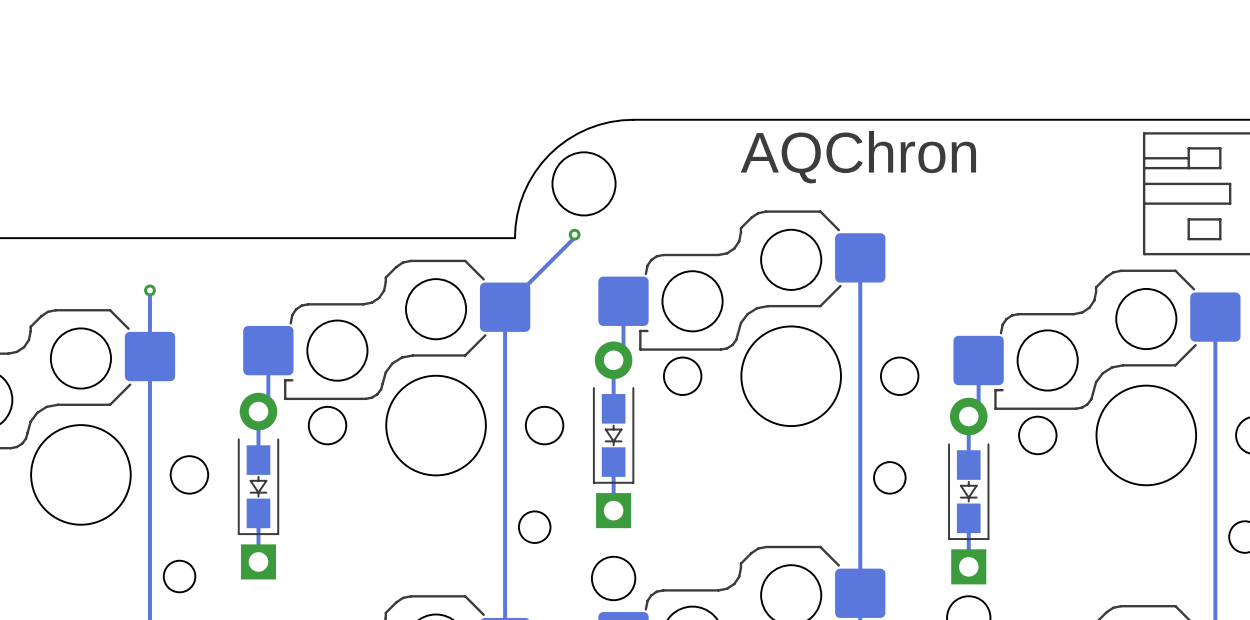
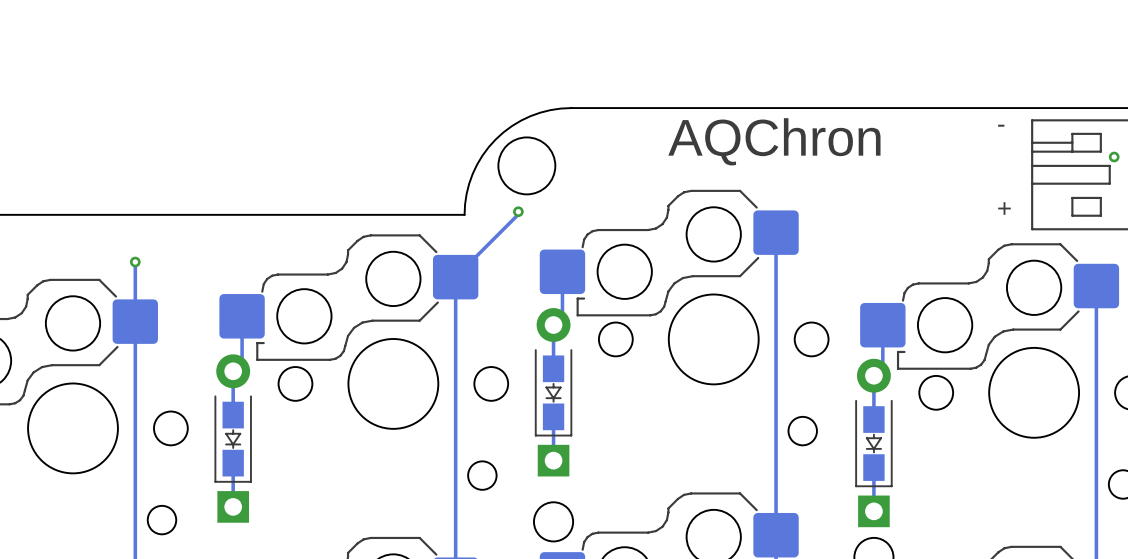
text: none -> - (1001, 125)
via: none -> (1114, 157)
text: none -> + (1004, 208)

